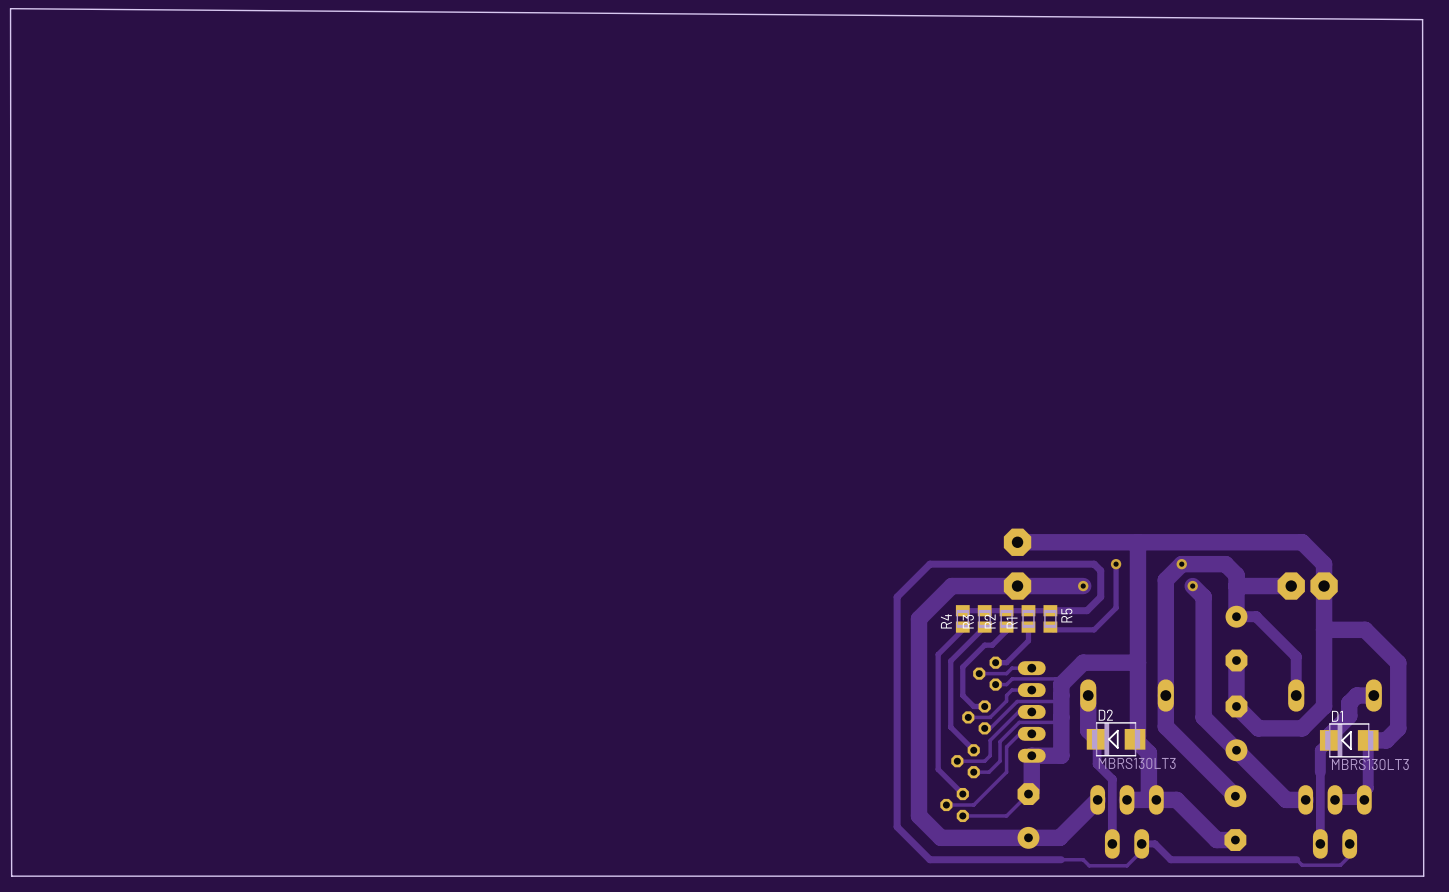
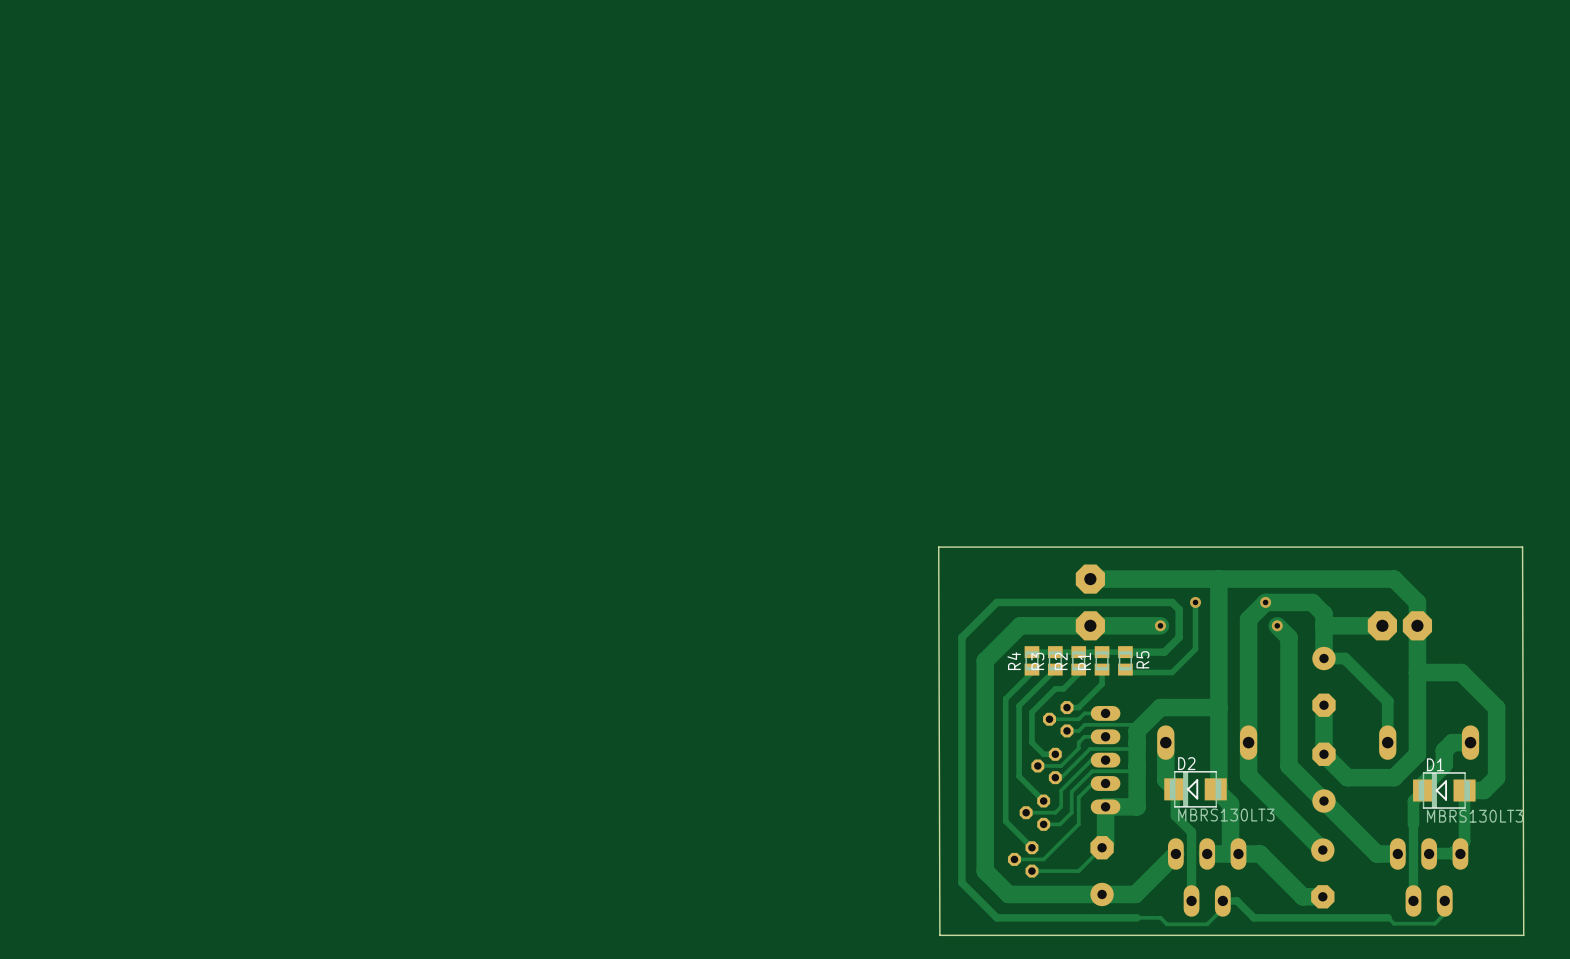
board edge: (1423, 876) (1422, 19) (10, 8) (11, 876) (876, 876) -> (1523, 935) (1522, 547) (938, 547) (939, 935)

